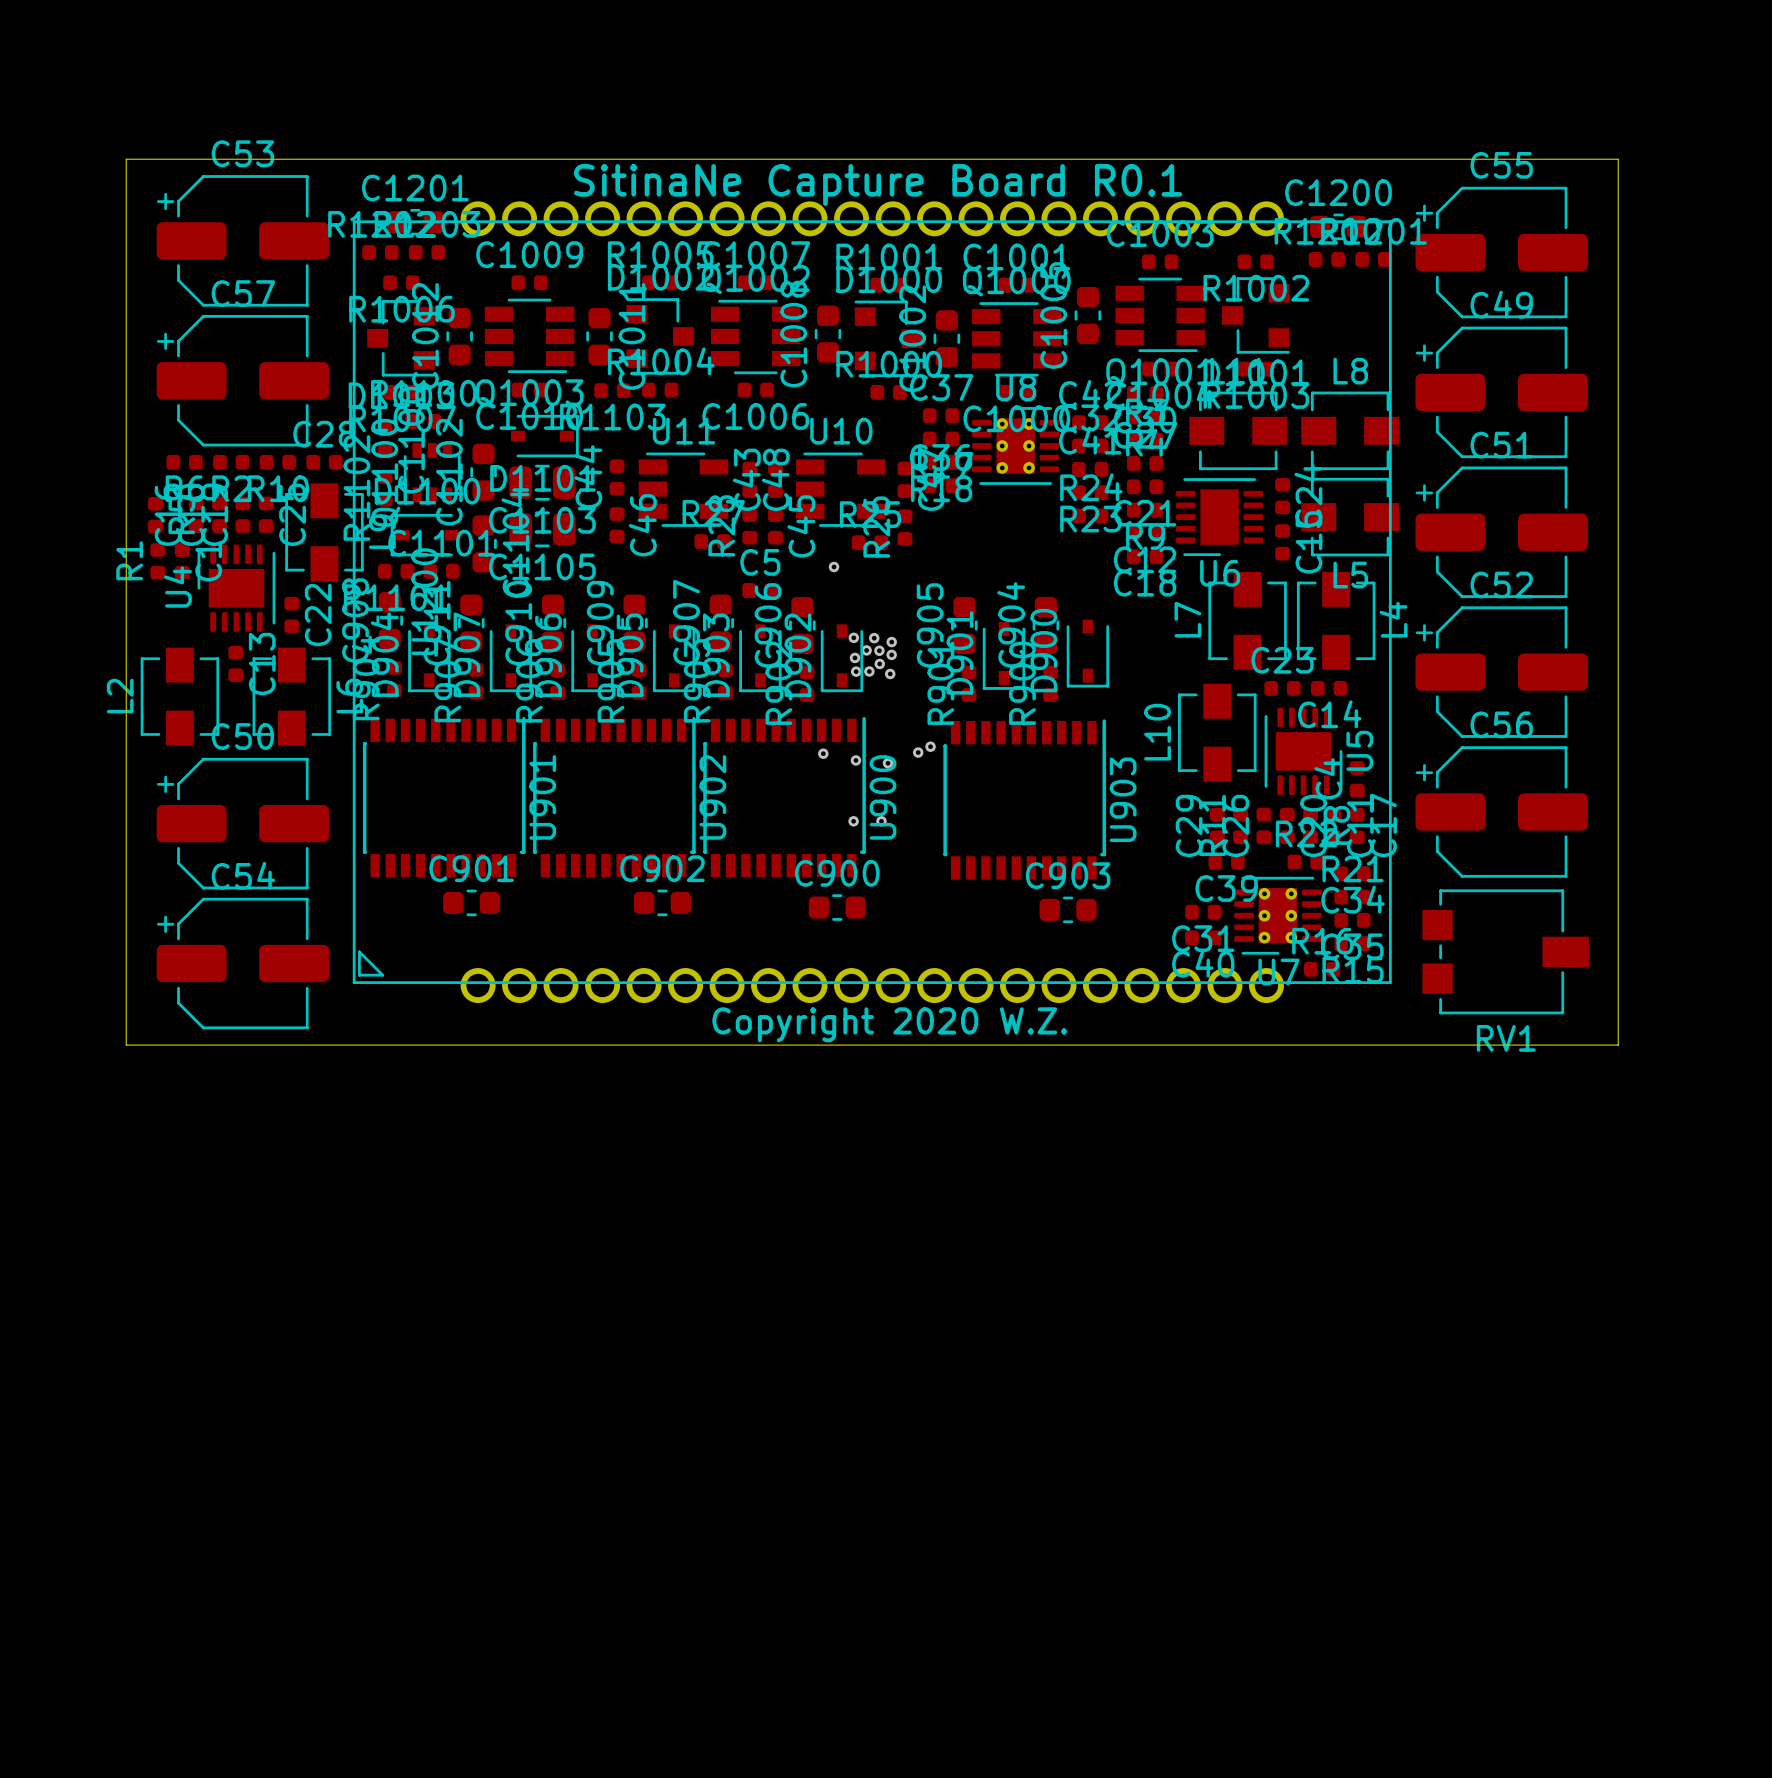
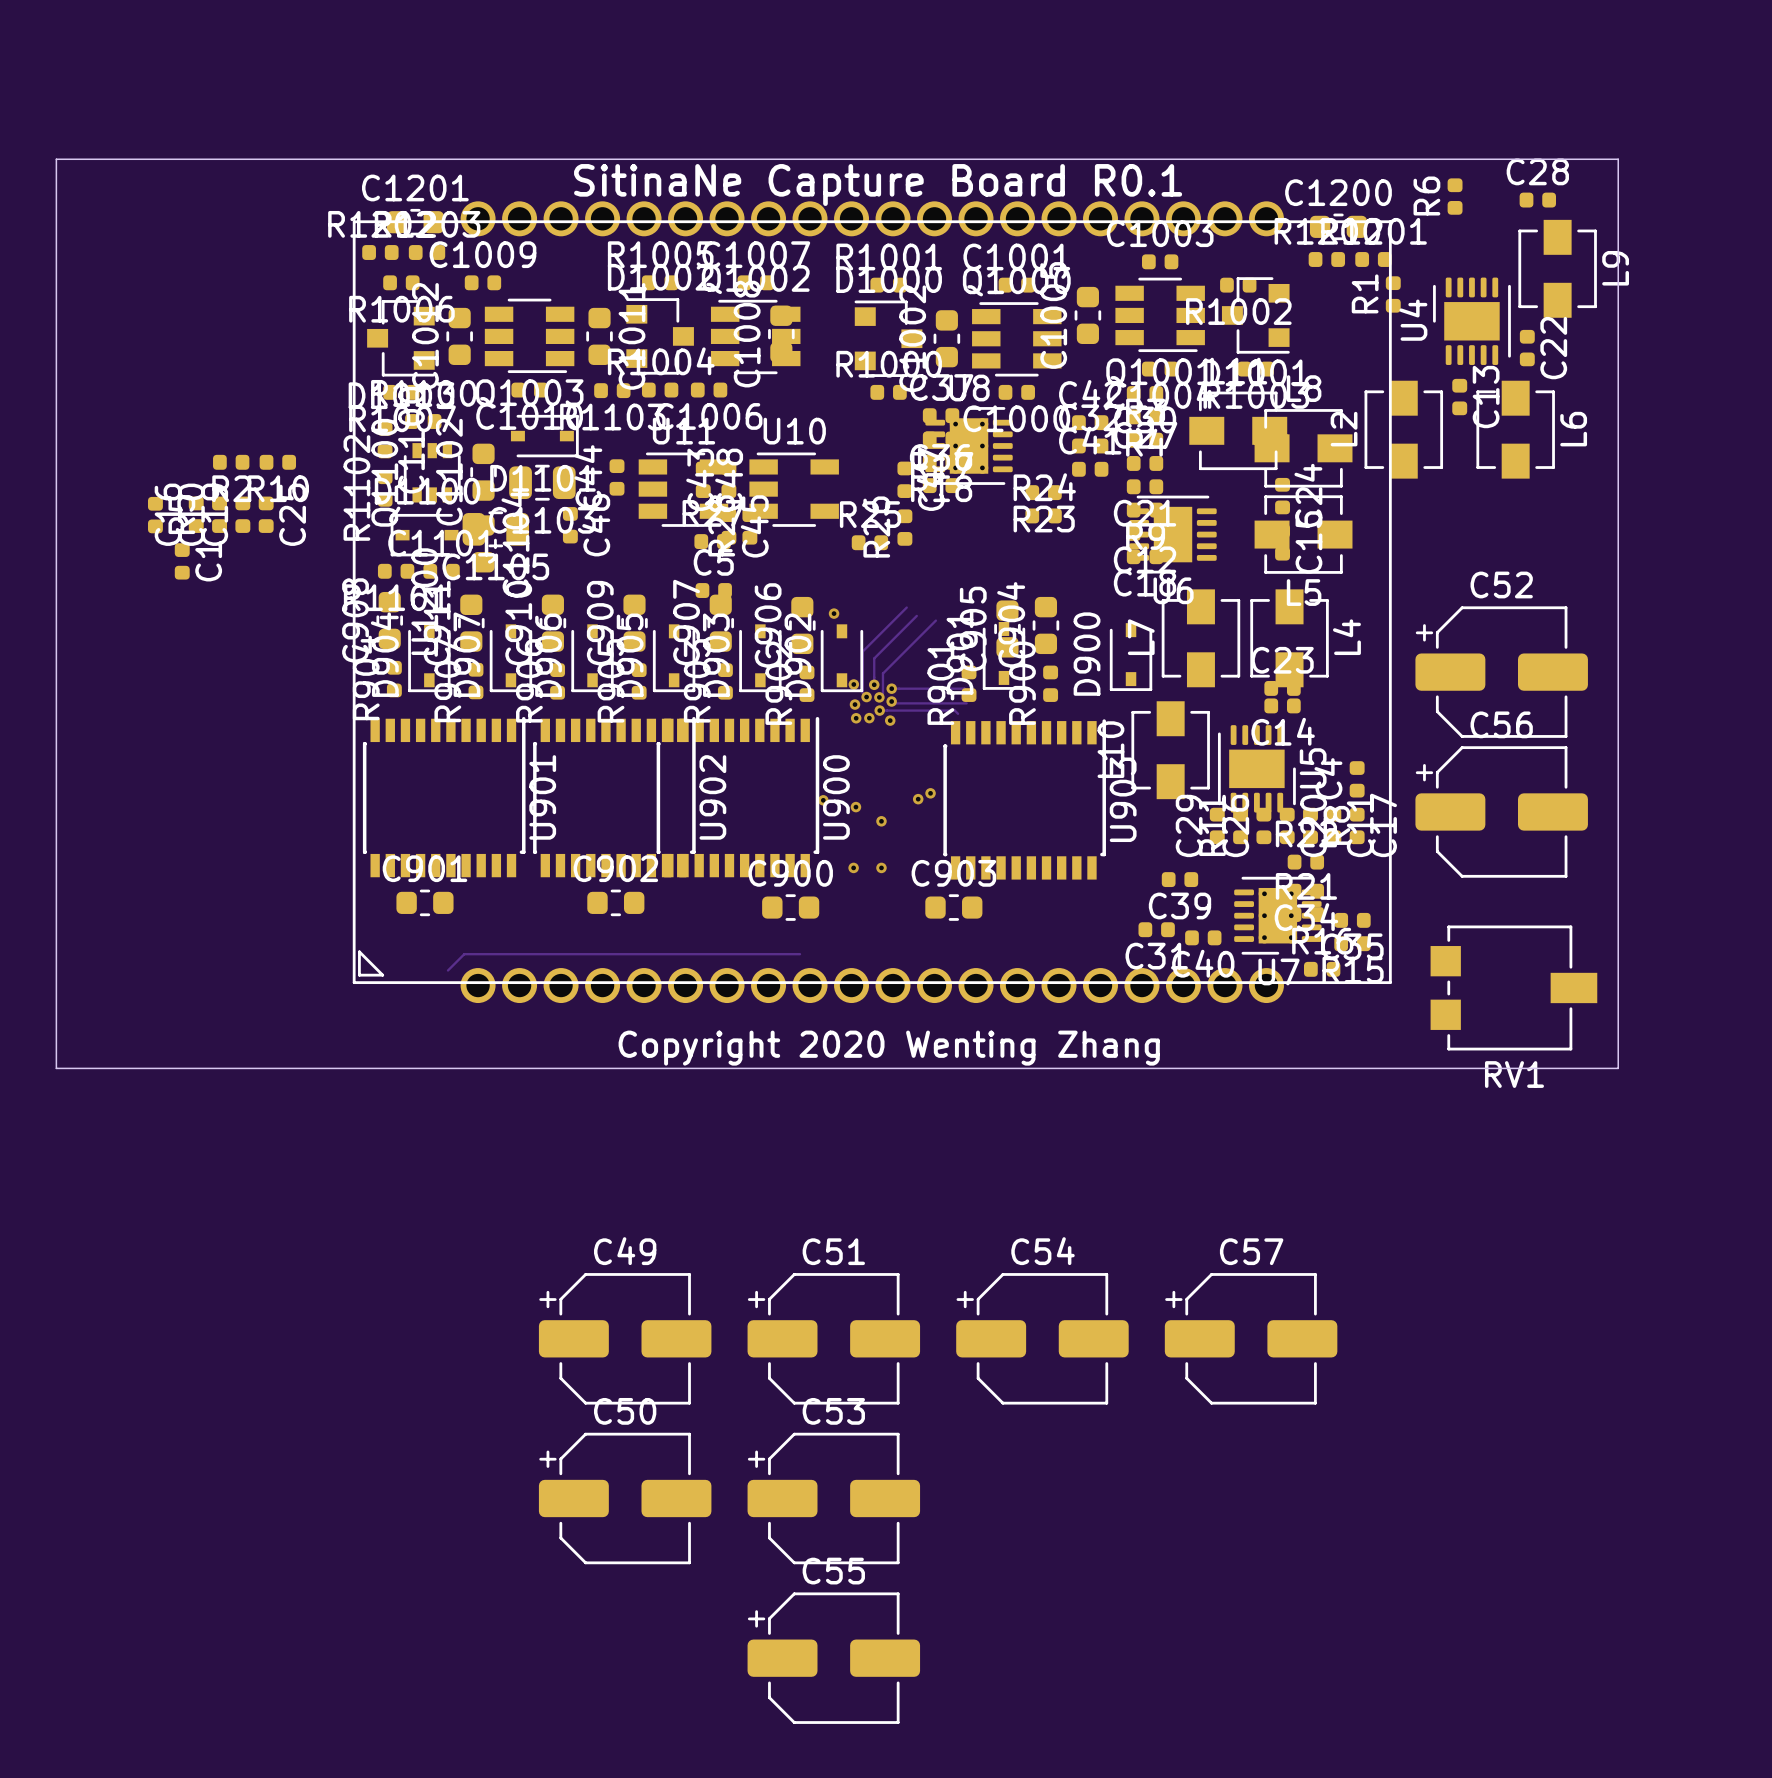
board edge: (126, 159) (126, 1045) (1618, 1045) -> (126, 159) (56, 159) (56, 1068) (1618, 1068) (1618, 1045)
C53 position: (242, 240) -> (833, 1498)
C55 position: (1501, 252) -> (833, 1658)
R1002 position: (1255, 261) -> (1238, 285)
C1009 position: (529, 282) -> (482, 282)
C1008 position: (827, 334) -> (781, 334)
C57 position: (242, 380) -> (1251, 1338)
C1006 position: (755, 390) -> (709, 390)
C49 position: (1501, 392) -> (625, 1338)
L8 position: (1350, 430) -> (1303, 448)
U8 position: (1015, 445) -> (969, 445)
R6 rotation: 0° (184, 462) -> 90° clockwise (1455, 196)
R6 position: (184, 462) -> (1455, 196)
C28 position: (324, 462) -> (1537, 200)
C48 position: (749, 479) -> (703, 479)
C43 position: (775, 479) -> (728, 479)
U10 position: (840, 489) -> (794, 489)
R23 position: (1090, 492) -> (1043, 492)
R24 position: (1090, 515) -> (1043, 515)
U6 position: (1219, 517) -> (1172, 534)
L5 position: (1350, 517) -> (1303, 534)
C46 position: (617, 525) -> (570, 525)
C45 position: (775, 526) -> (728, 526)
C1105 position: (542, 529) -> (495, 529)
L9 position: (324, 532) -> (1557, 268)
C51 position: (1501, 532) -> (833, 1338)
R1 position: (157, 561) -> (1393, 294)
via: (834, 566) -> none
U4 position: (236, 588) -> (1471, 321)
C5 position: (760, 590) -> (713, 590)
track: none -> (906, 607) (862, 651) (862, 693) (866, 697)
via: none -> (834, 613)
C22 position: (291, 614) -> (1527, 348)
track: none -> (916, 615) (874, 658) (874, 684)
track: none -> (935, 620) (882, 673) (882, 693) (879, 697)
L7 position: (1247, 620) -> (1200, 638)
L4 position: (1336, 620) -> (1289, 638)
C905 position: (964, 625) -> (1007, 628)
via: (853, 637) -> none
via: (874, 638) -> none
via: (891, 642) -> none
via: (866, 650) -> none
via: (879, 650) -> none
D900 position: (1087, 653) -> (1131, 657)
via: (891, 654) -> none
via: (855, 657) -> none
C13 position: (235, 663) -> (1459, 397)
via: (879, 663) -> none
via: (856, 671) -> none
via: (869, 671) -> none
via: (890, 673) -> none
via: none -> (853, 684)
via: none -> (874, 684)
track: none -> (891, 688) (964, 688) (967, 691)
via: none -> (891, 688)
C14 position: (1329, 688) -> (1282, 705)
L2 position: (179, 696) -> (1403, 429)
L6 position: (291, 696) -> (1515, 429)
via: none -> (866, 697)
via: none -> (879, 697)
track: none -> (891, 701) (893, 703) (966, 703)
via: none -> (891, 701)
via: none -> (855, 704)
track: none -> (879, 710) (954, 710) (958, 713)
via: none -> (879, 710)
via: none -> (856, 718)
via: none -> (869, 718)
via: none -> (890, 720)
L10 position: (1217, 732) -> (1170, 750)
via: (930, 746) -> none
U5 position: (1303, 751) -> (1256, 768)
via: (918, 752) -> none
via: (823, 753) -> none
via: (855, 760) -> none
via: (888, 763) -> none
via: none -> (930, 793)
U900 position: (784, 797) -> (737, 797)
via: none -> (918, 799)
via: none -> (823, 800)
via position: (853, 821) -> (855, 807)
C50 position: (242, 823) -> (625, 1498)
C39 position: (1226, 862) -> (1179, 879)
via: none -> (853, 867)
via: none -> (881, 867)
C34 position: (1352, 873) -> (1305, 891)
R21 position: (1352, 897) -> (1305, 914)
C901 position: (471, 902) -> (424, 902)
C902 position: (662, 902) -> (615, 902)
C900 position: (837, 907) -> (790, 907)
C903 position: (1068, 909) -> (953, 907)
C31 position: (1203, 912) -> (1156, 929)
RV1 position: (1505, 951) -> (1513, 987)
track: none -> (800, 954) (464, 954) (448, 970)
C54 position: (242, 963) -> (1042, 1338)
text: Copyright 2020 W.Z. (889, 1024) -> Copyright 2020 Wenting Zhang (889, 1048)

